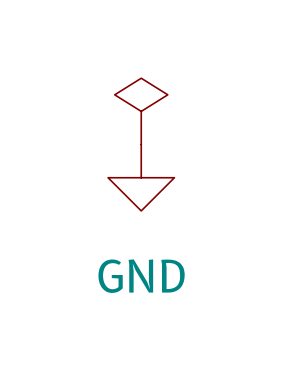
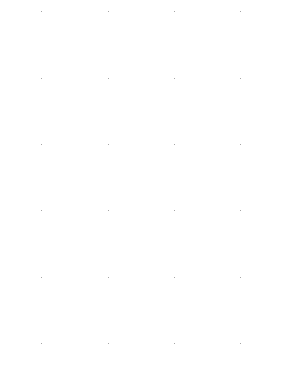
power symbol: (141, 111) -> none
power symbol: GND (141, 177) -> none

